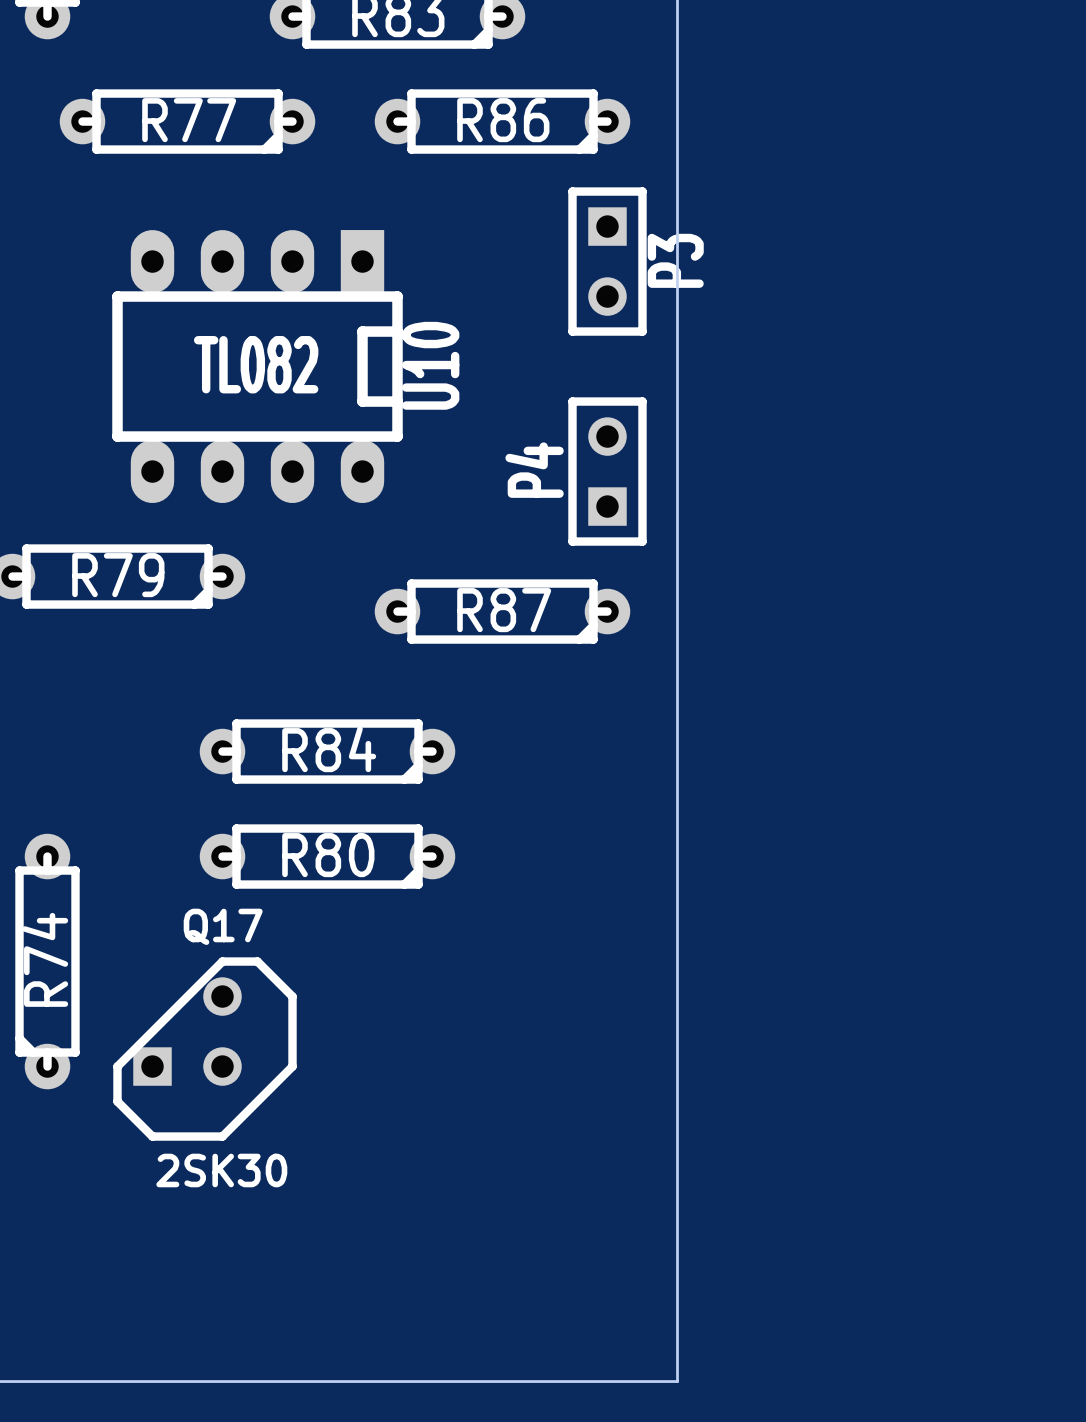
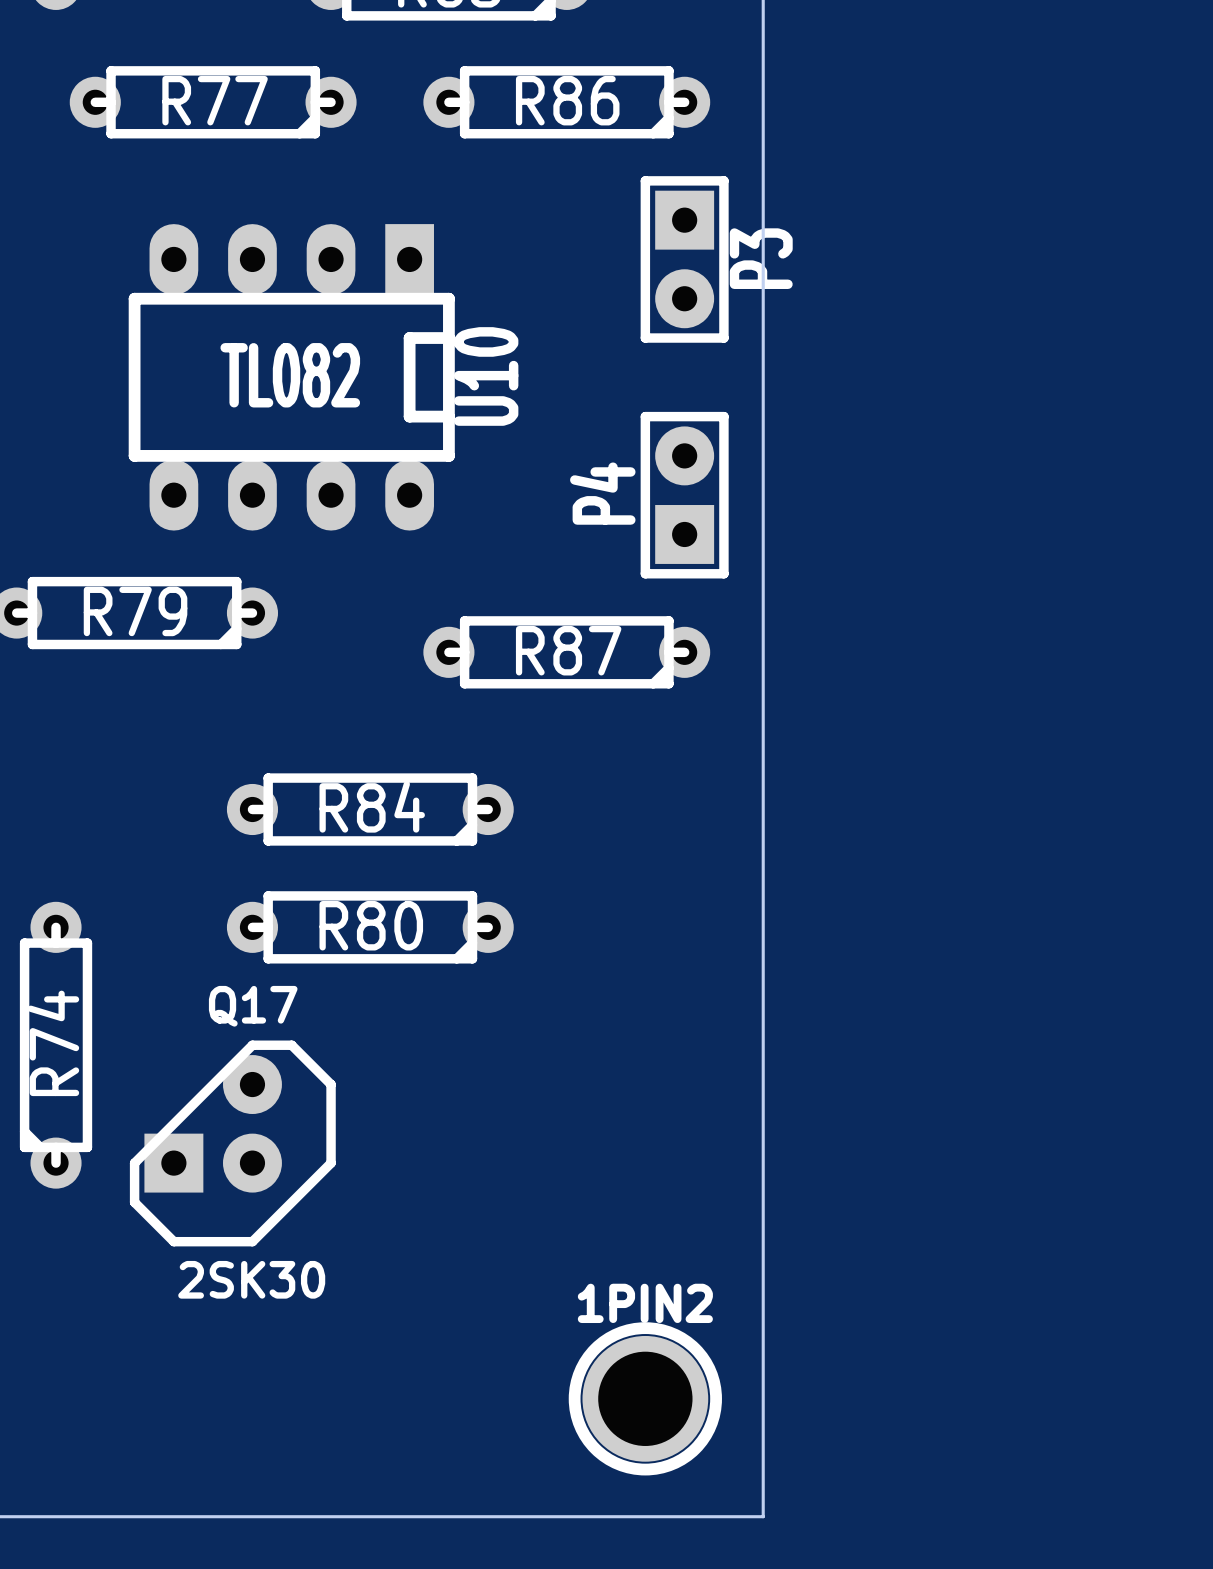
P3 footprint: [568, 187, 647, 336] -> [640, 176, 729, 343]
P4 footprint: [568, 397, 647, 546] -> [640, 411, 729, 579]
Q17 footprint: [113, 957, 297, 1141] -> [129, 1040, 336, 1247]
1PIN2: none -> (645, 1398)

